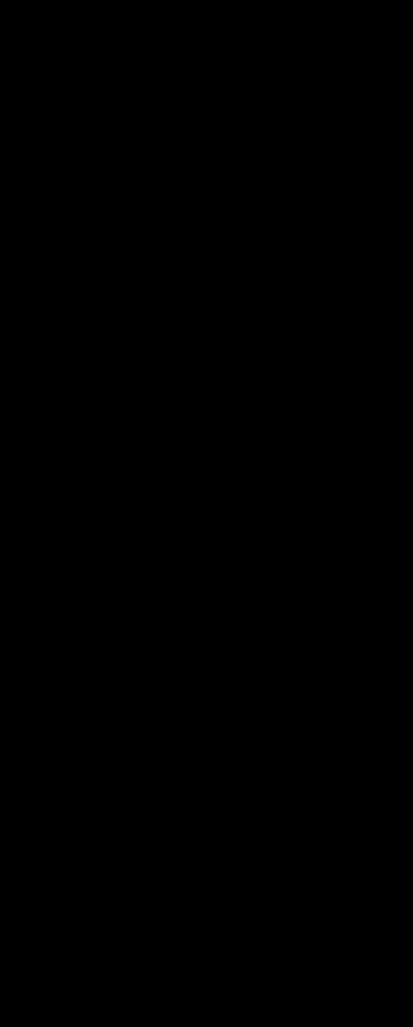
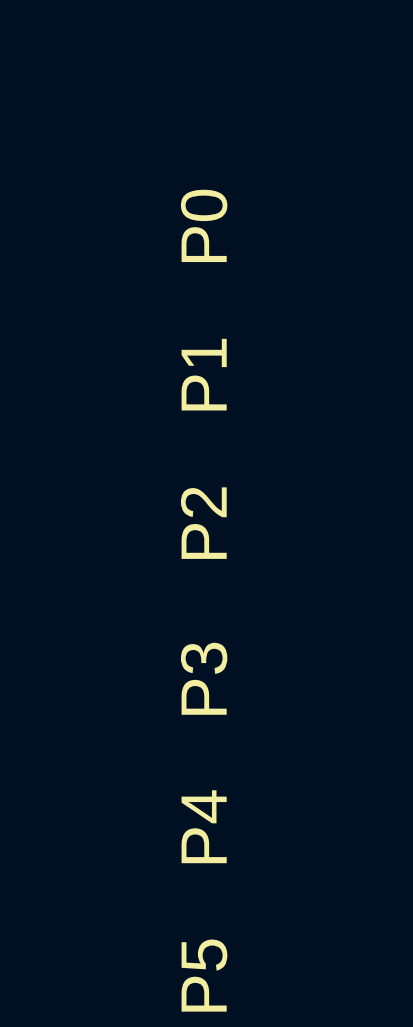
text: none -> P0 (204, 225)
text: none -> P1 (204, 374)
text: none -> P2 (203, 523)
text: none -> P3 (204, 678)
text: none -> P4 (204, 826)
text: none -> P5 (204, 975)

